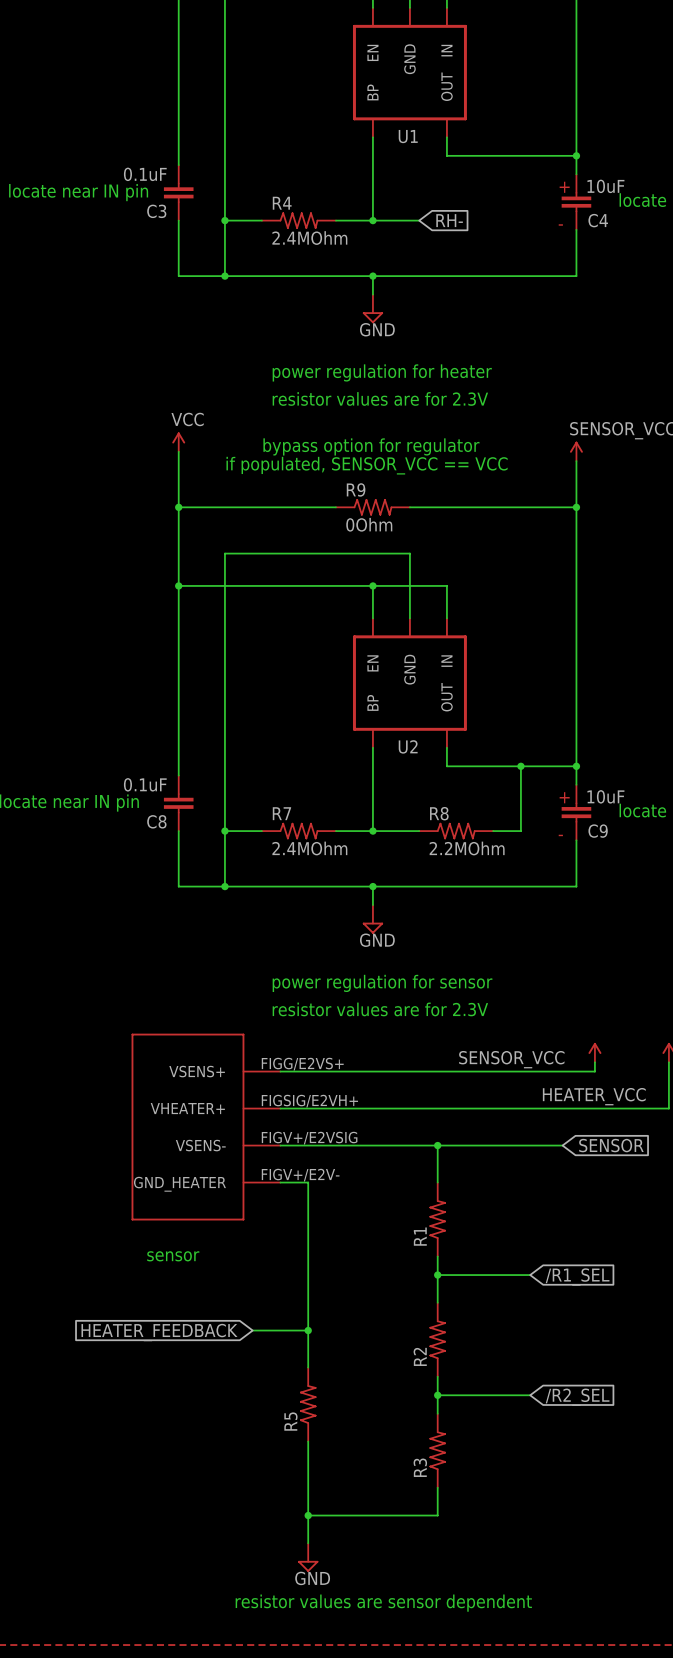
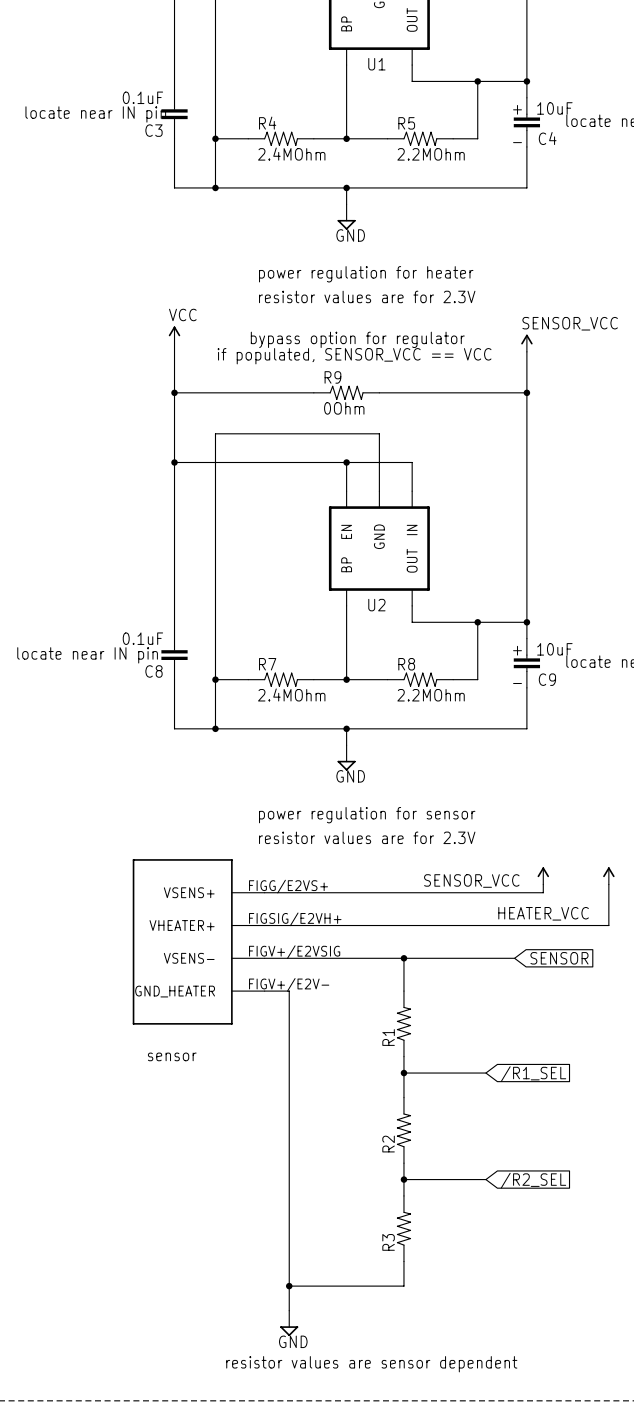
wire: none -> (477, 81) (477, 138) (453, 138)
junction: none -> (477, 81)
global label: RH- (449, 220) -> none
R5 value: none -> 2.2MOhm (431, 154)
wire: (252, 1330) (308, 1330) -> none
junction: (308, 1330) -> none
global label: HEATER_FEEDBACK (159, 1332) -> none
R5 rotation: 0° (308, 1404) -> 90° clockwise (420, 138)
R5 position: (308, 1404) -> (420, 138)

